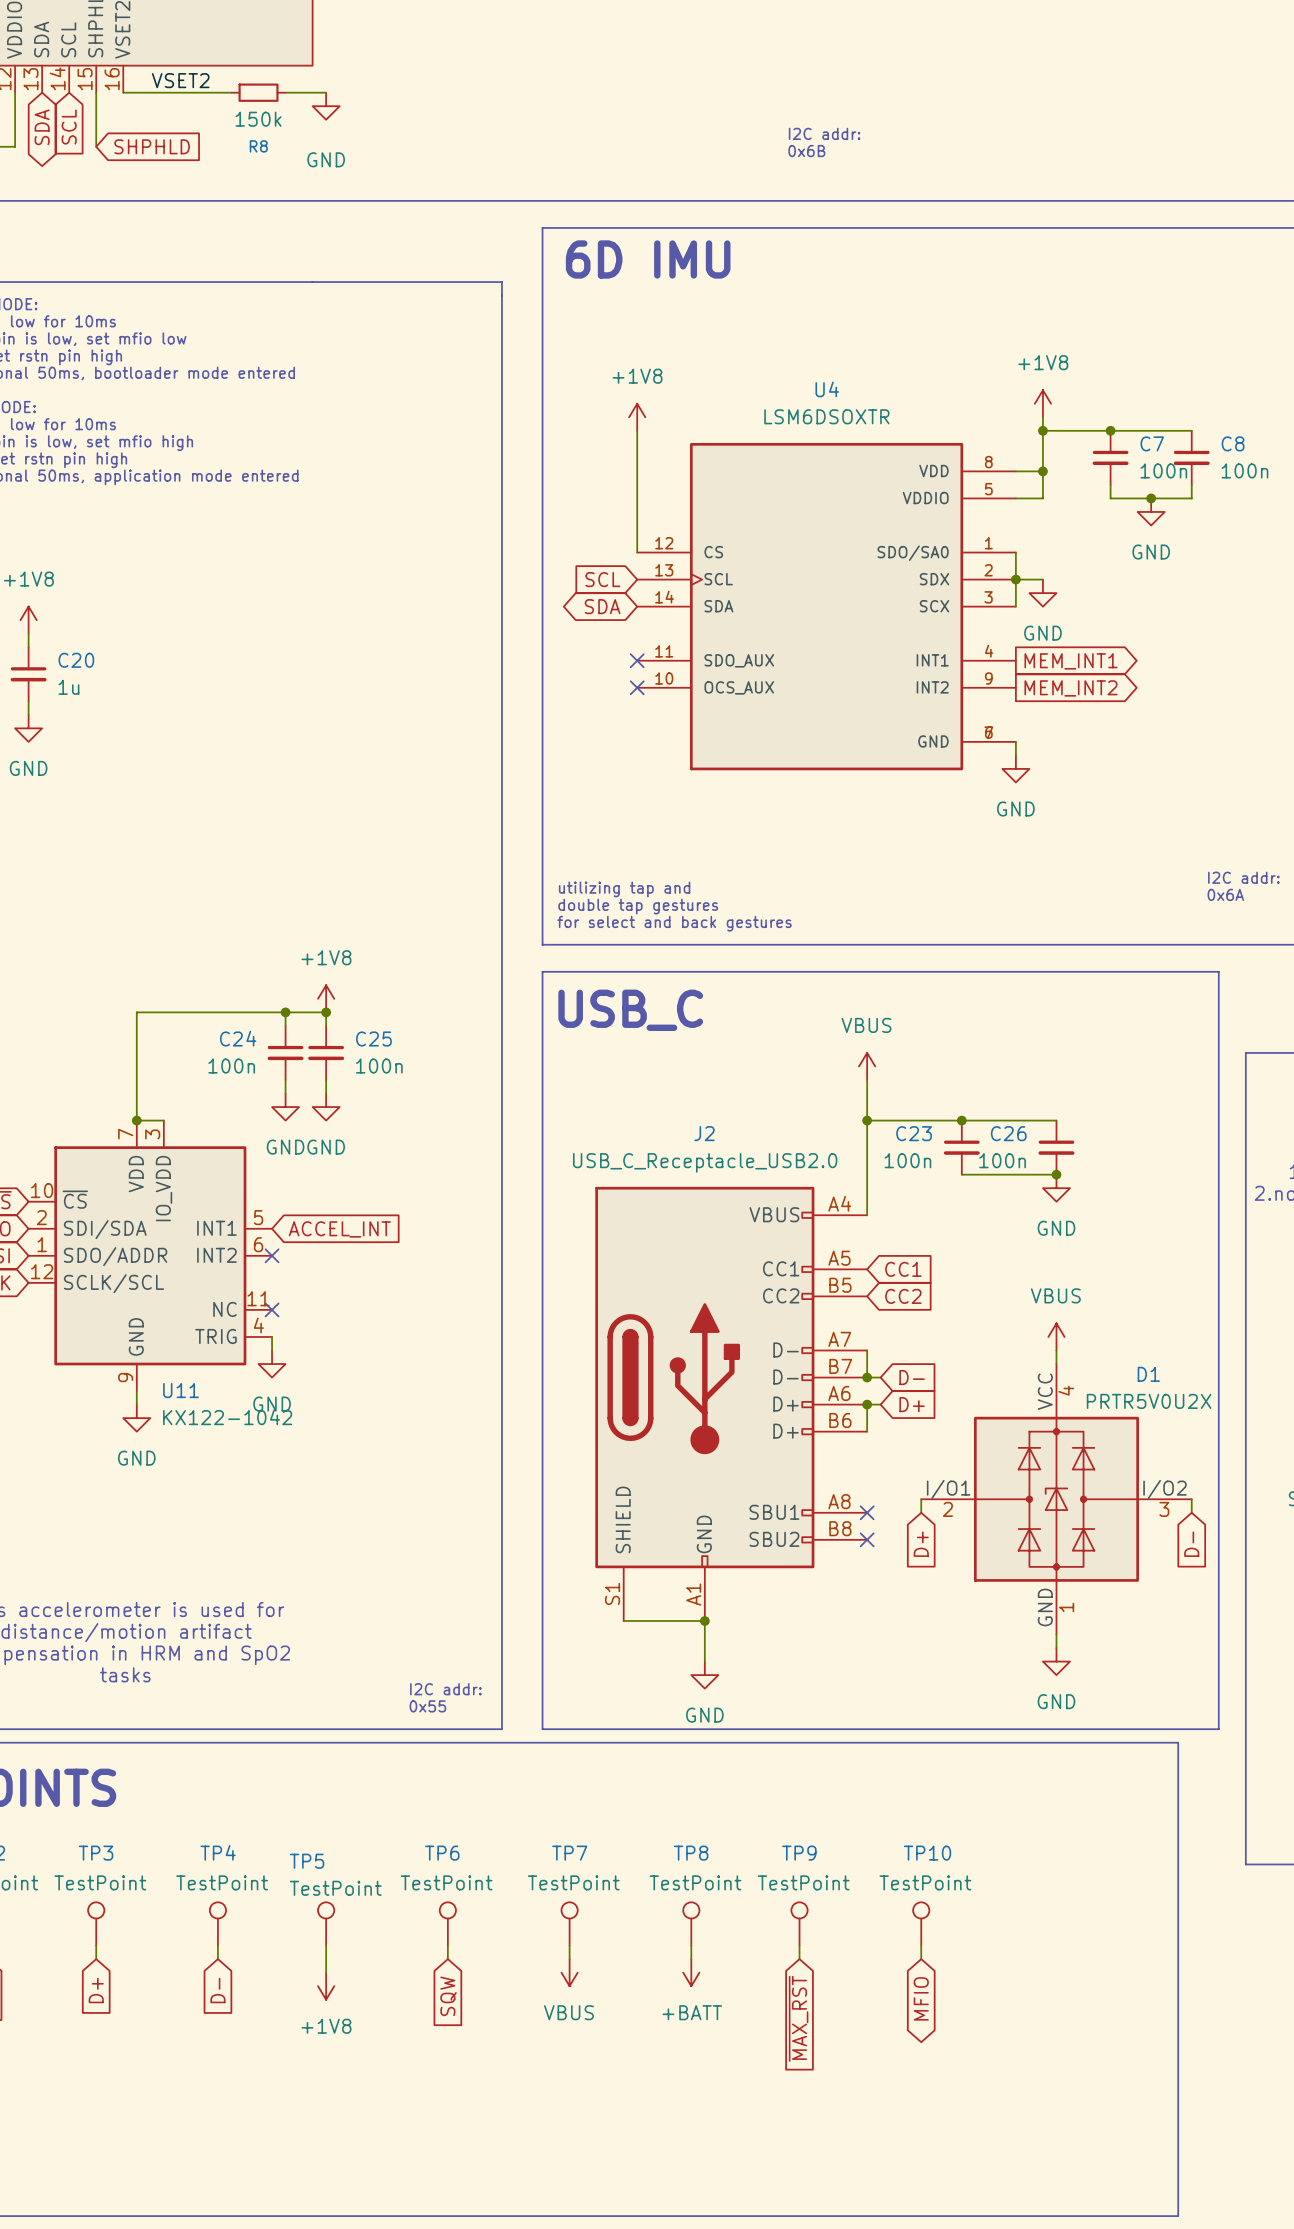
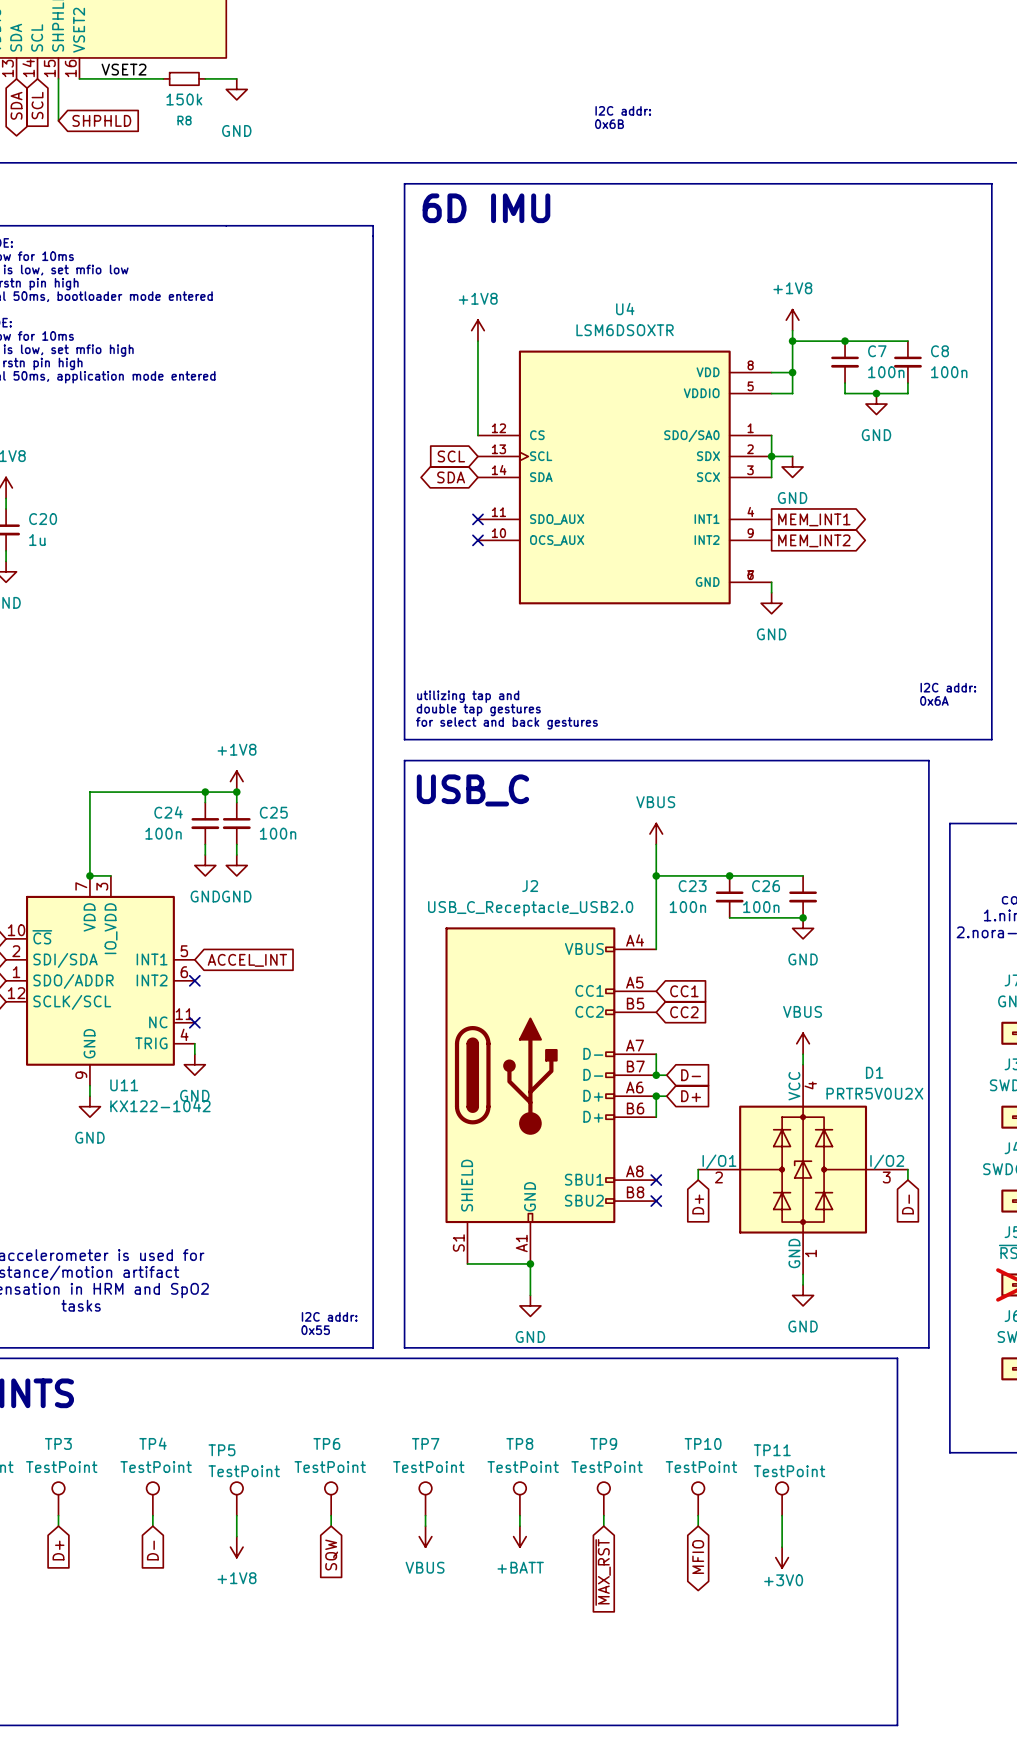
TP11: none -> TestPoint (782, 1498)
wire: none -> (782, 1515) (782, 1547)
power symbol: none -> +3V0 (782, 1557)

